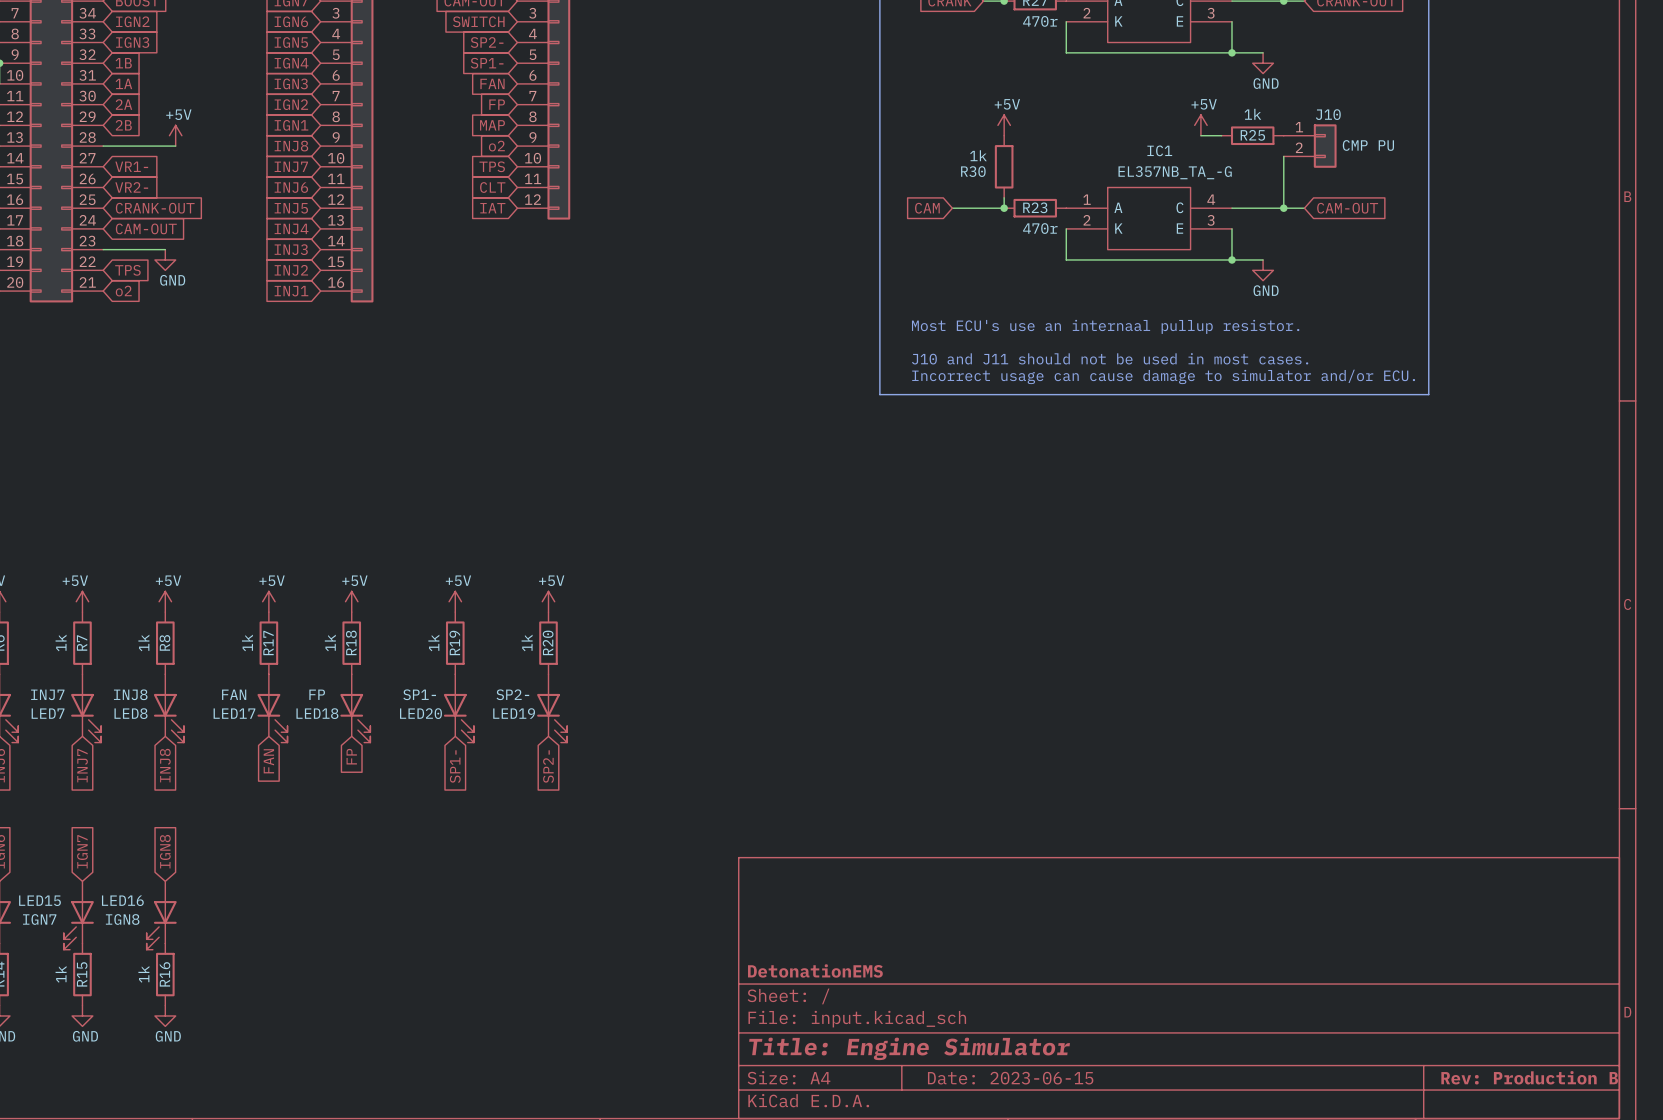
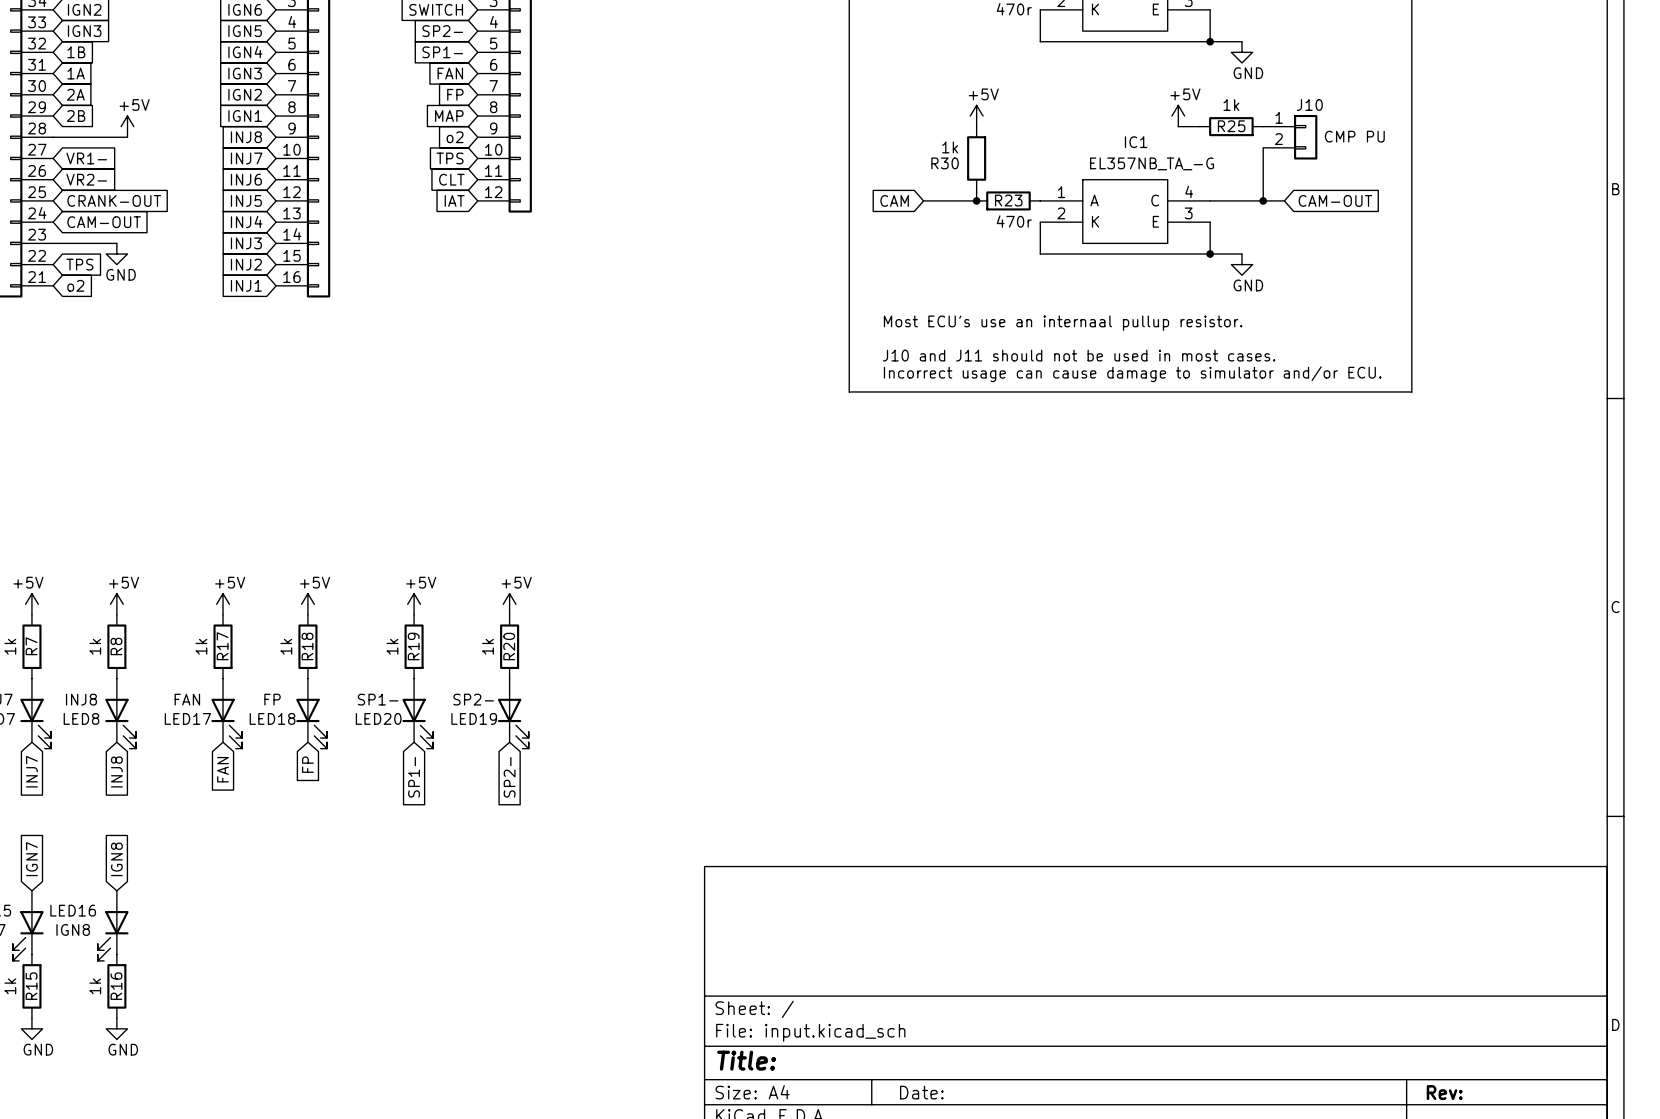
title block: DetonationEMS (815, 970) -> none
title block: Title: Engine Simulator (909, 1048) -> Title: (746, 1060)
title block: Rev: Production B (1529, 1077) -> Rev: (1444, 1092)
title block: Date: 2023-06-15 (1010, 1078) -> Date: (921, 1092)

